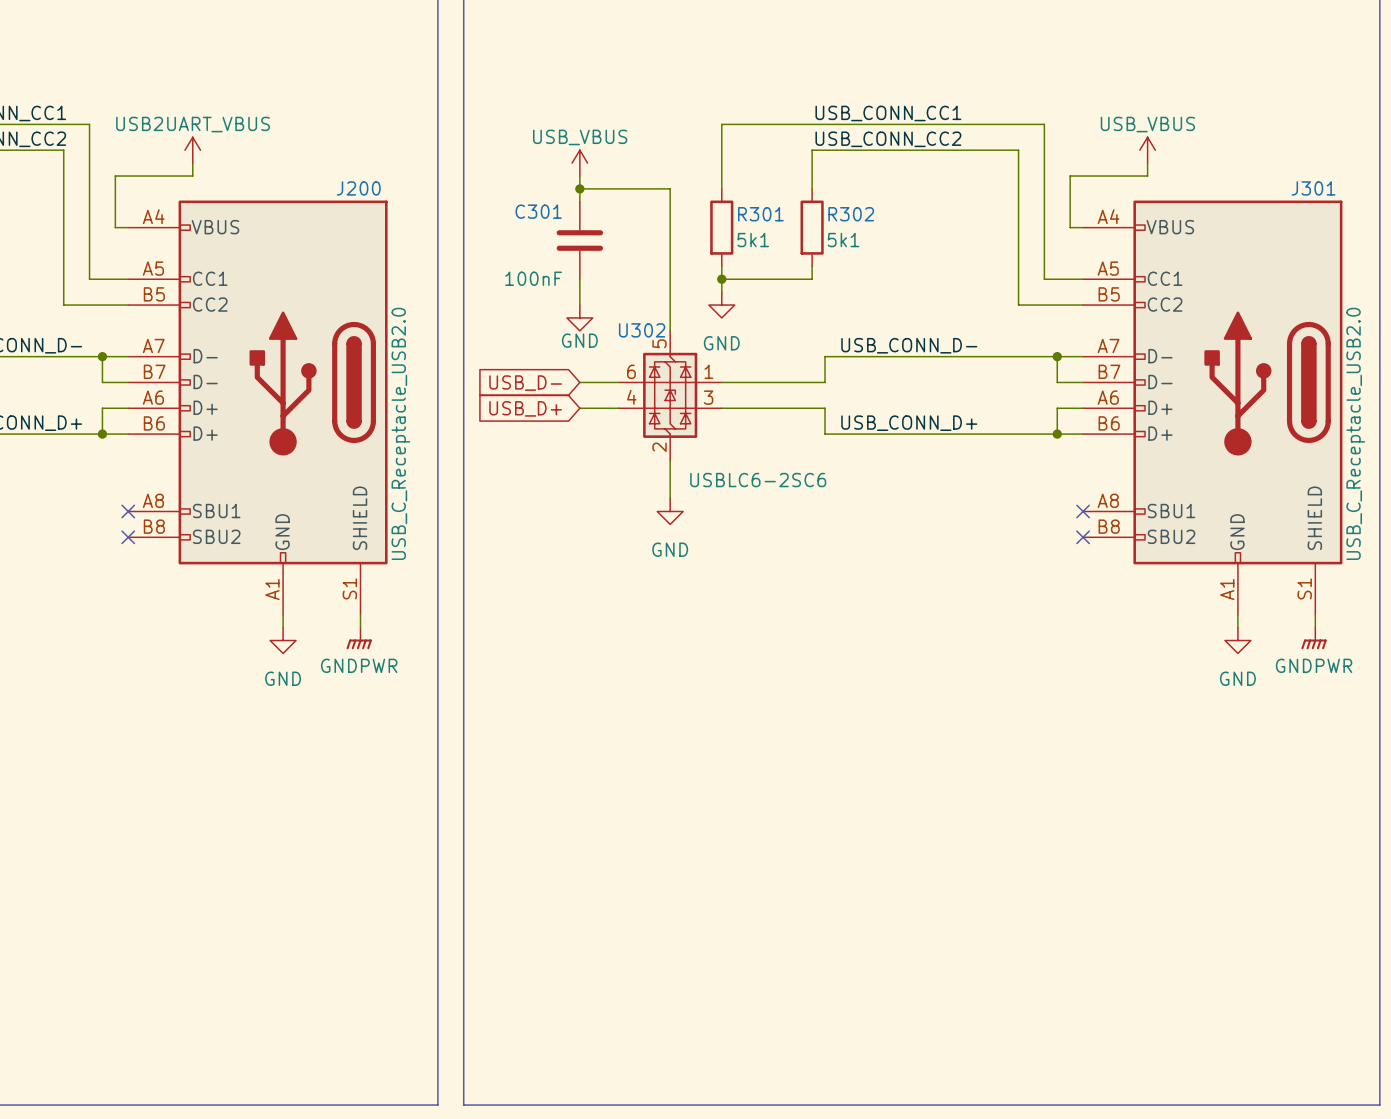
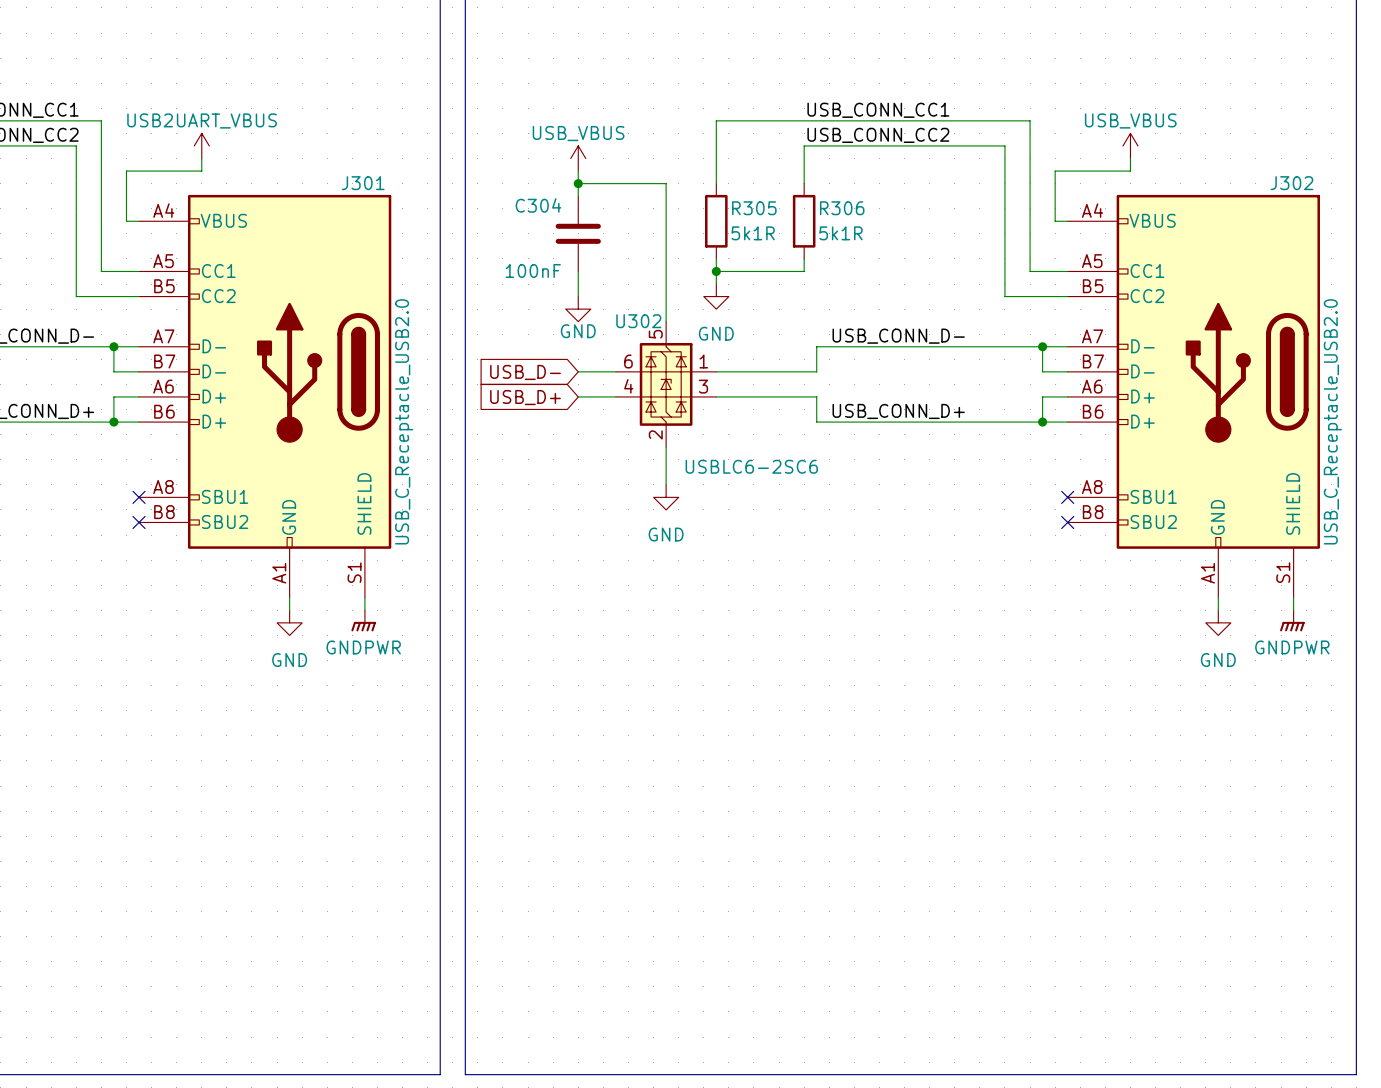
J200 name: J200 (358, 188) -> J301 (363, 183)
J301 name: J301 (1313, 188) -> J302 (1291, 183)
C301 name: C301 (538, 211) -> C304 (538, 205)
R301 name: R301 (760, 214) -> R305 (754, 208)
R302 name: R302 (851, 214) -> R306 (842, 208)
R301 value: 5k1 (753, 240) -> 5k1R (753, 233)
R302 value: 5k1 (843, 240) -> 5k1R (841, 233)

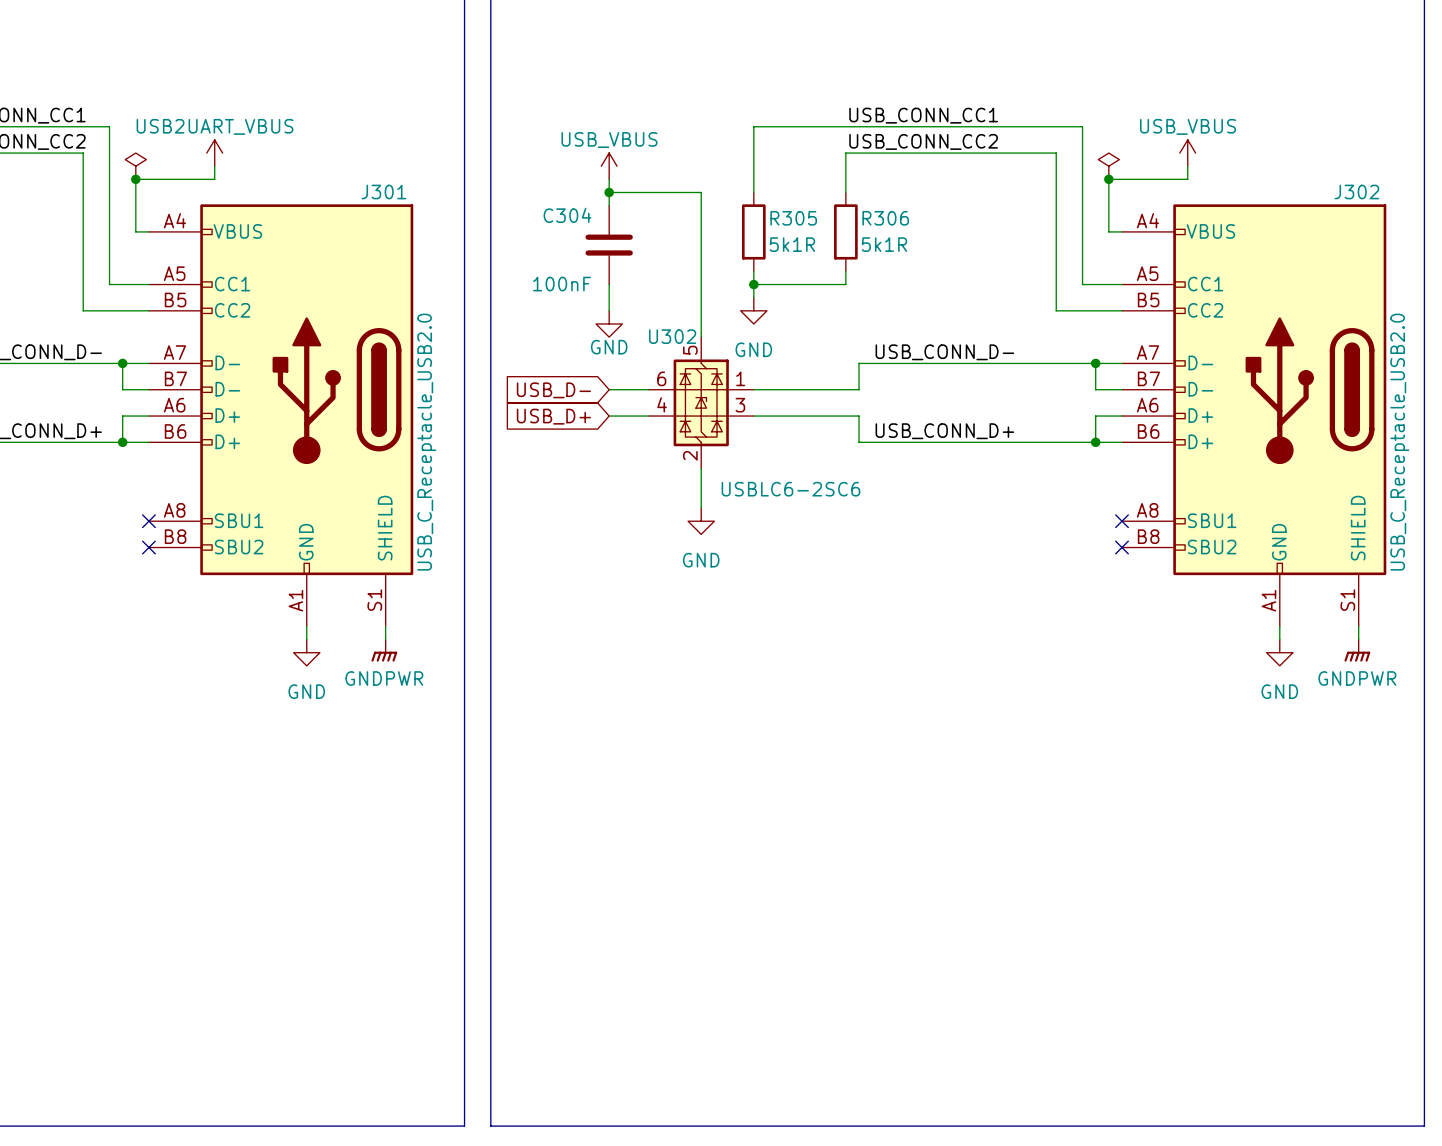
power symbol: none -> (135, 166)
power symbol: none -> (1108, 166)
junction: none -> (135, 179)
junction: none -> (1108, 179)

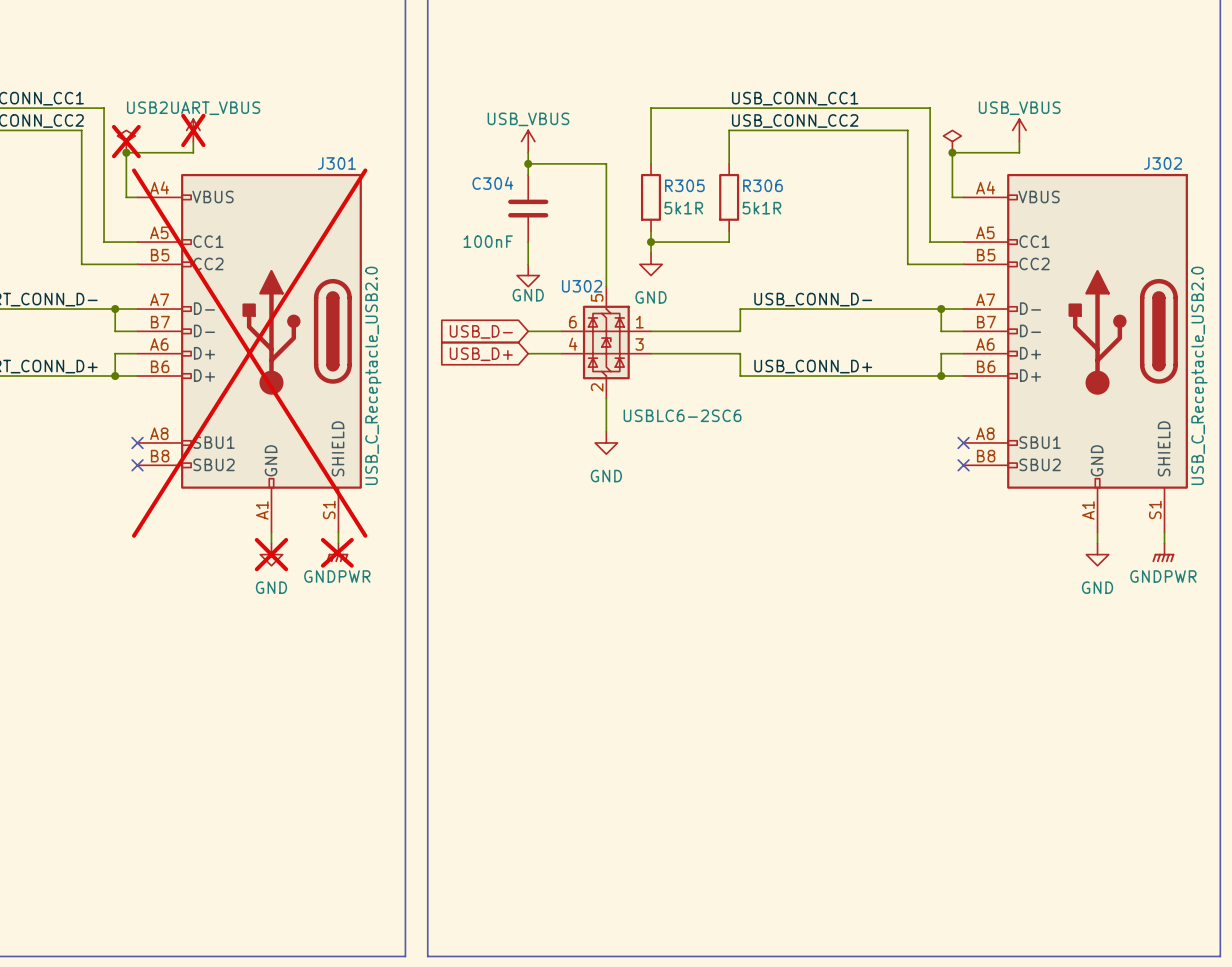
power symbol do-not-place cross: none -> (193, 130)
power symbol do-not-place cross: none -> (126, 141)
J301 do-not-place cross: none -> (249, 353)
power symbol do-not-place cross: none -> (337, 552)
power symbol do-not-place cross: none -> (271, 554)

